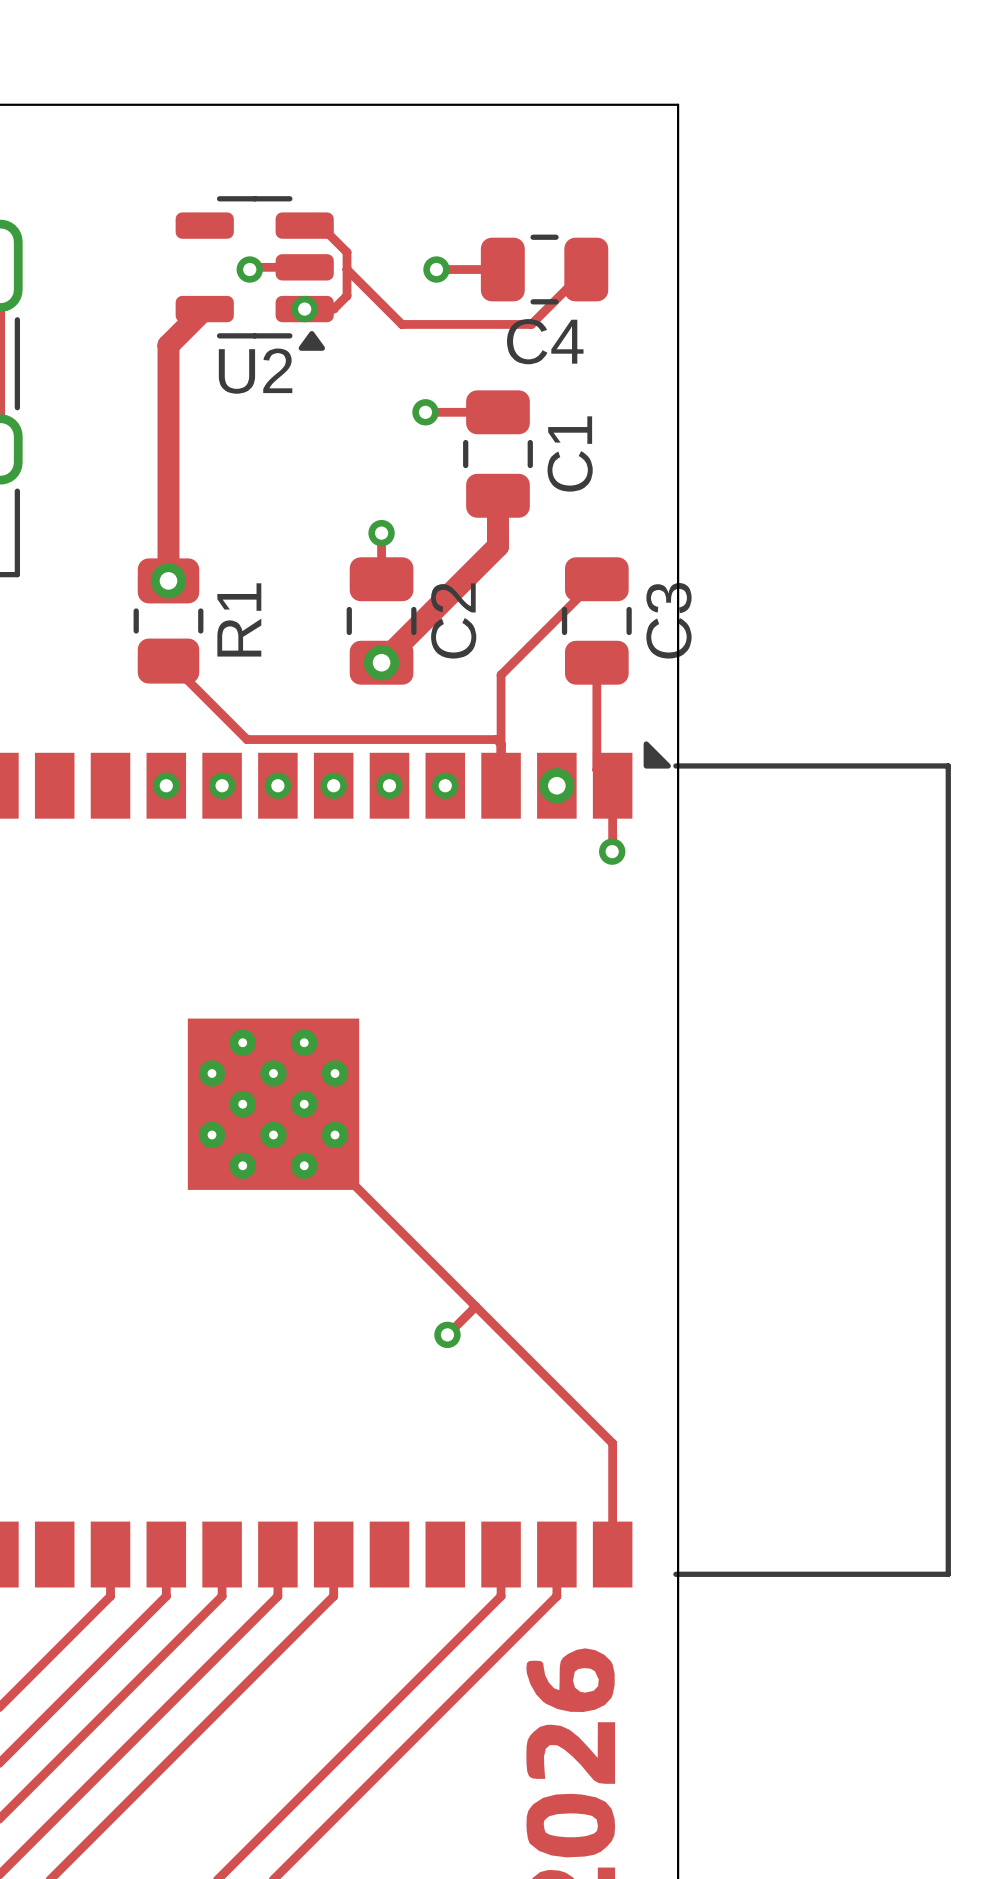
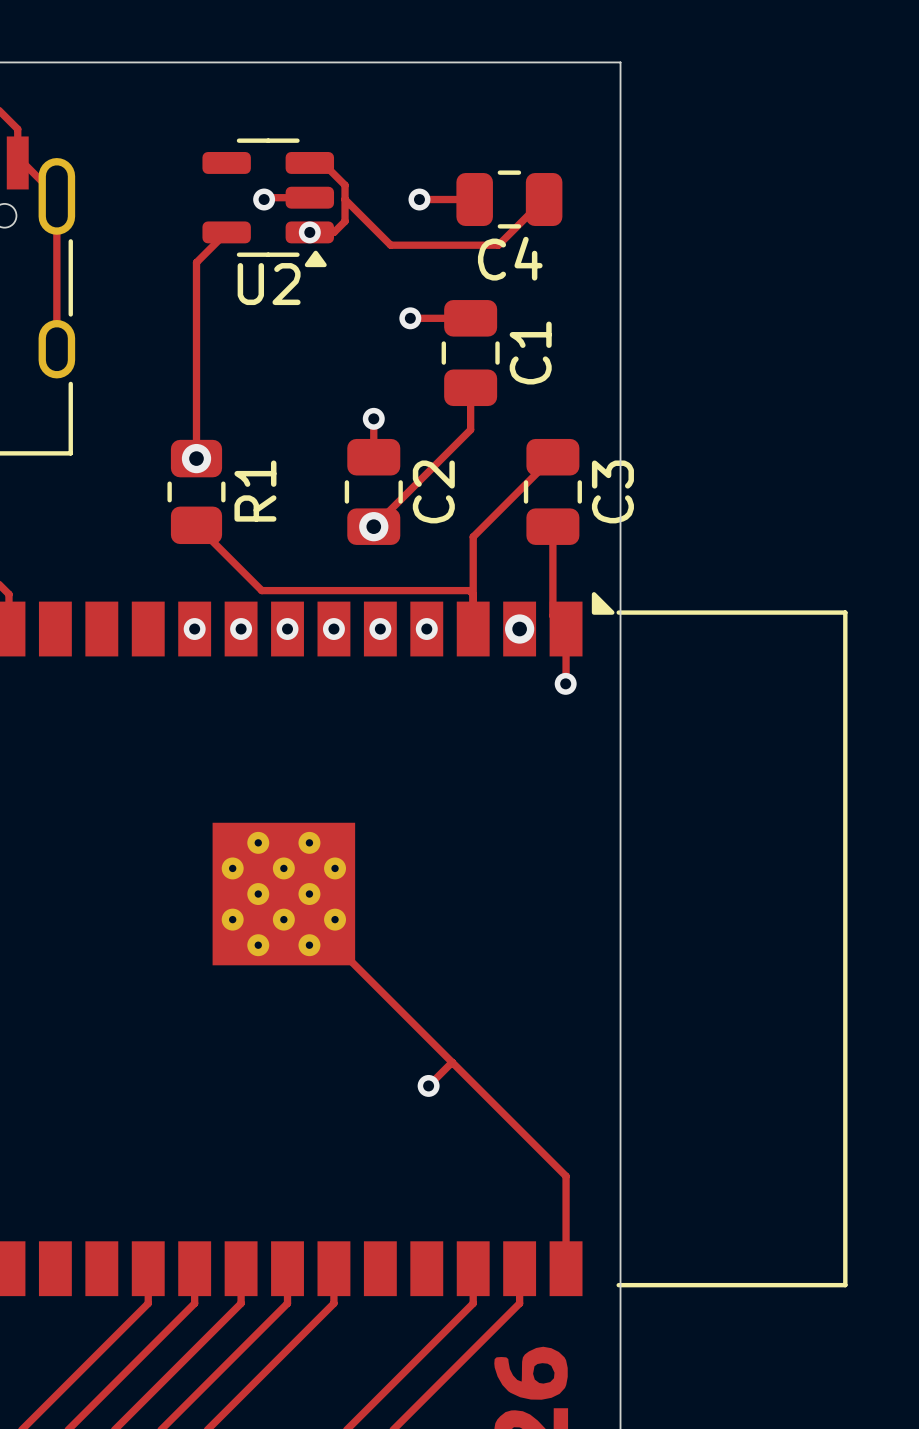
track width: thick (204, 309) (168, 345) (168, 580) -> thin (226, 232) (196, 262) (196, 458)
track width: thick (497, 495) (497, 546) (381, 662) -> thin (470, 387) (470, 429) (373, 526)

